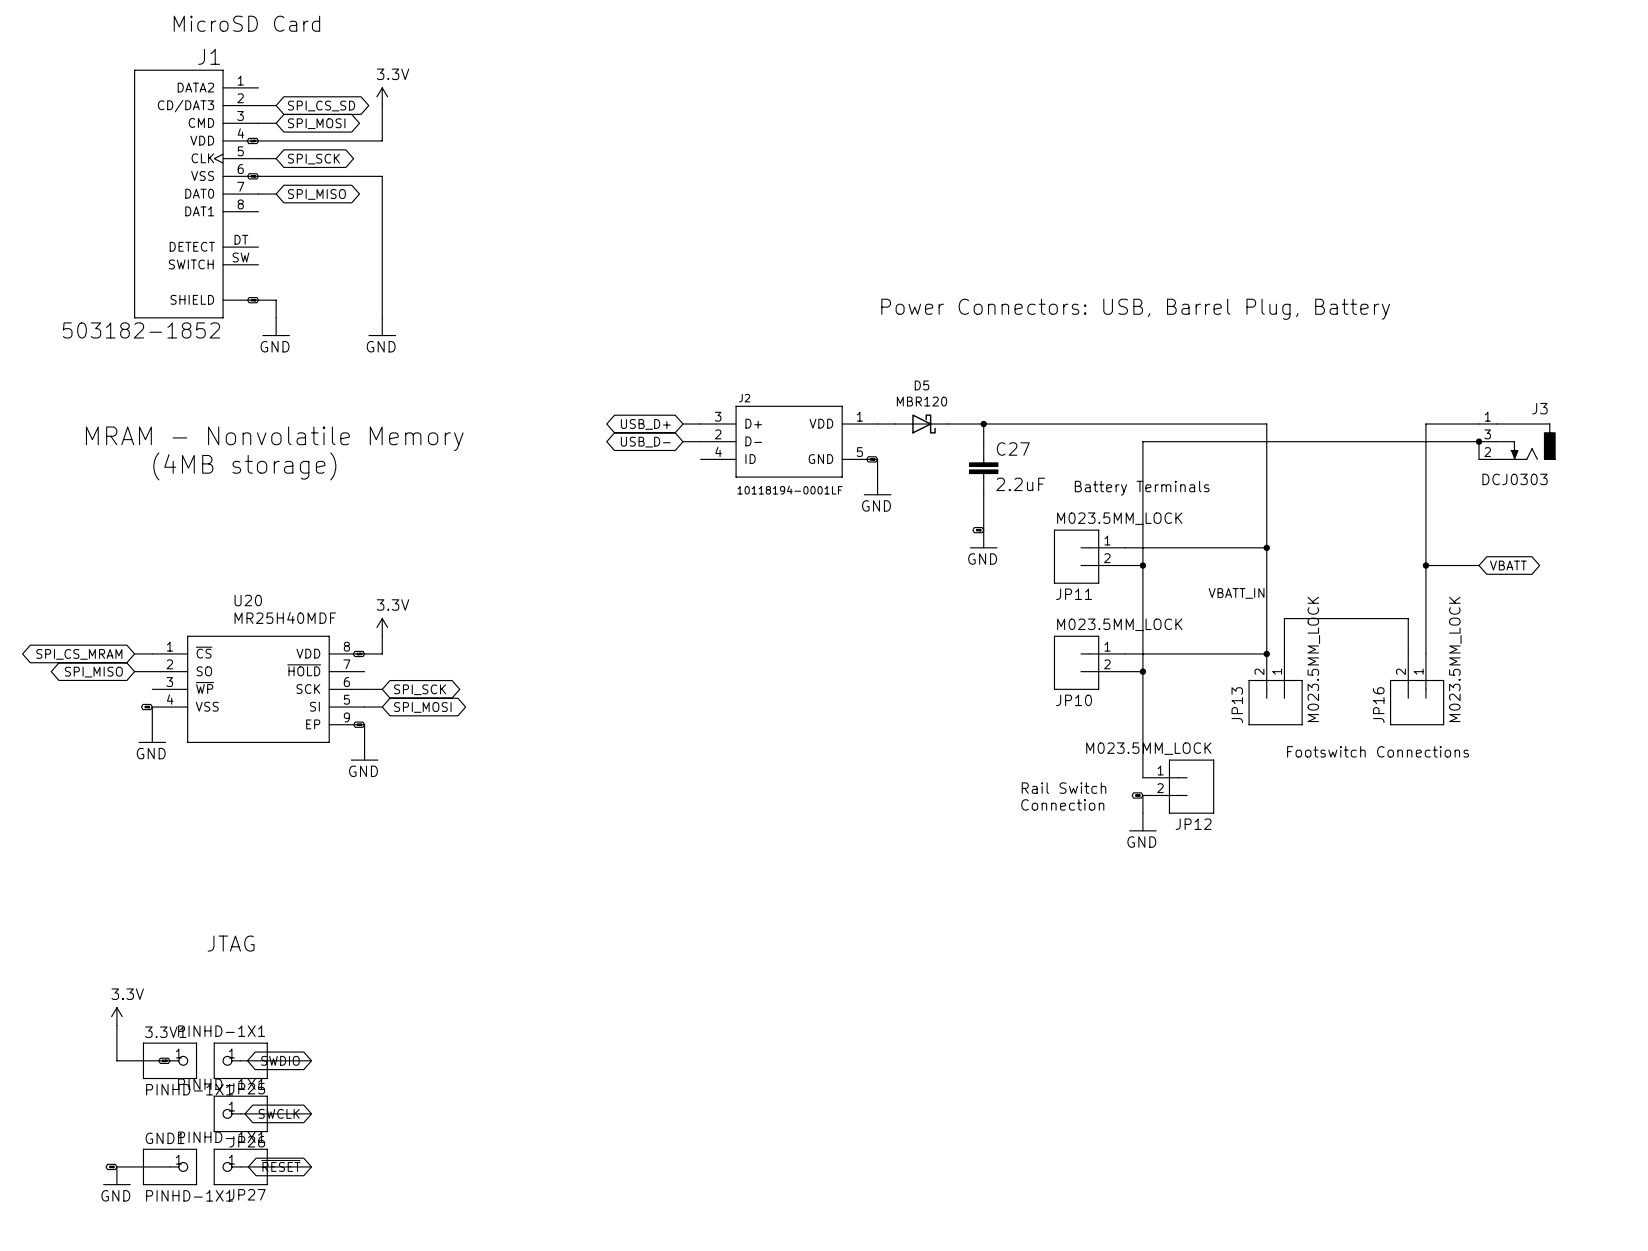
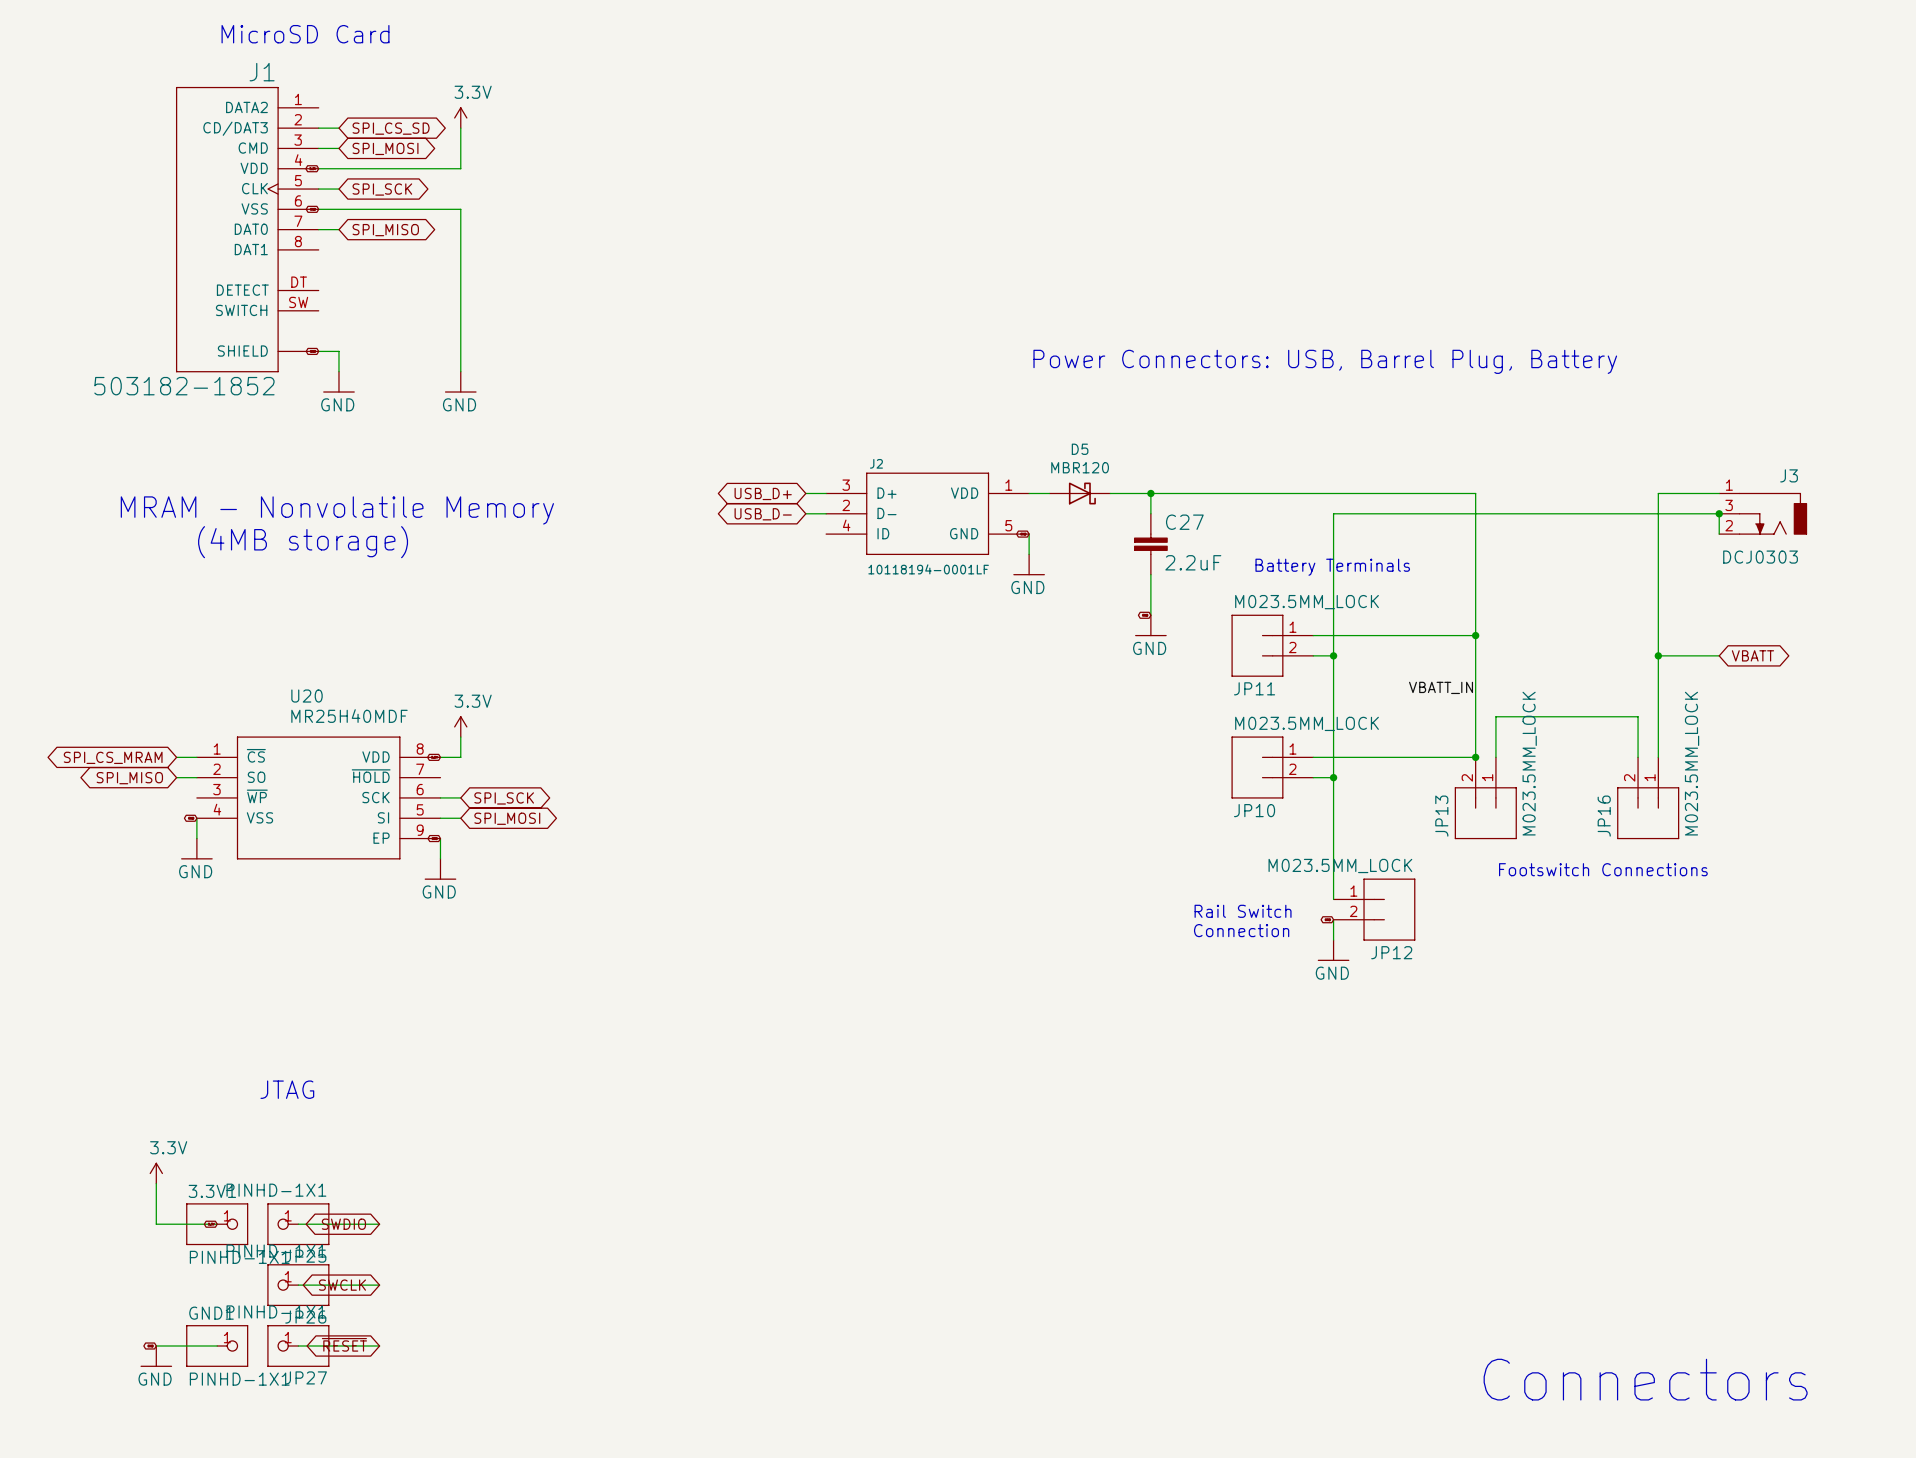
text: none -> Connectors (1645, 1379)

